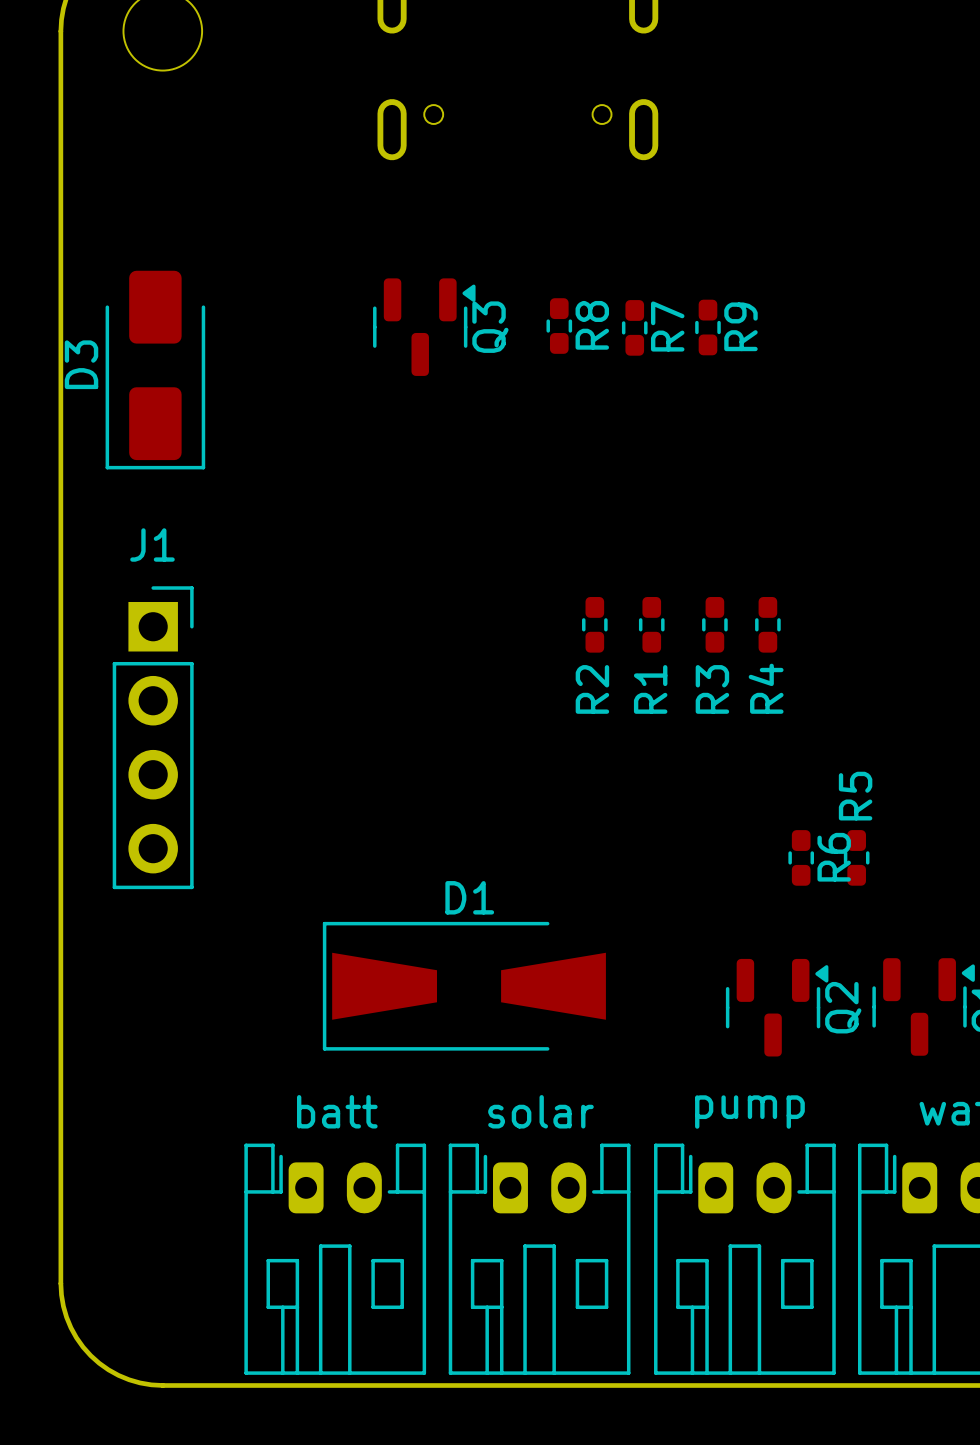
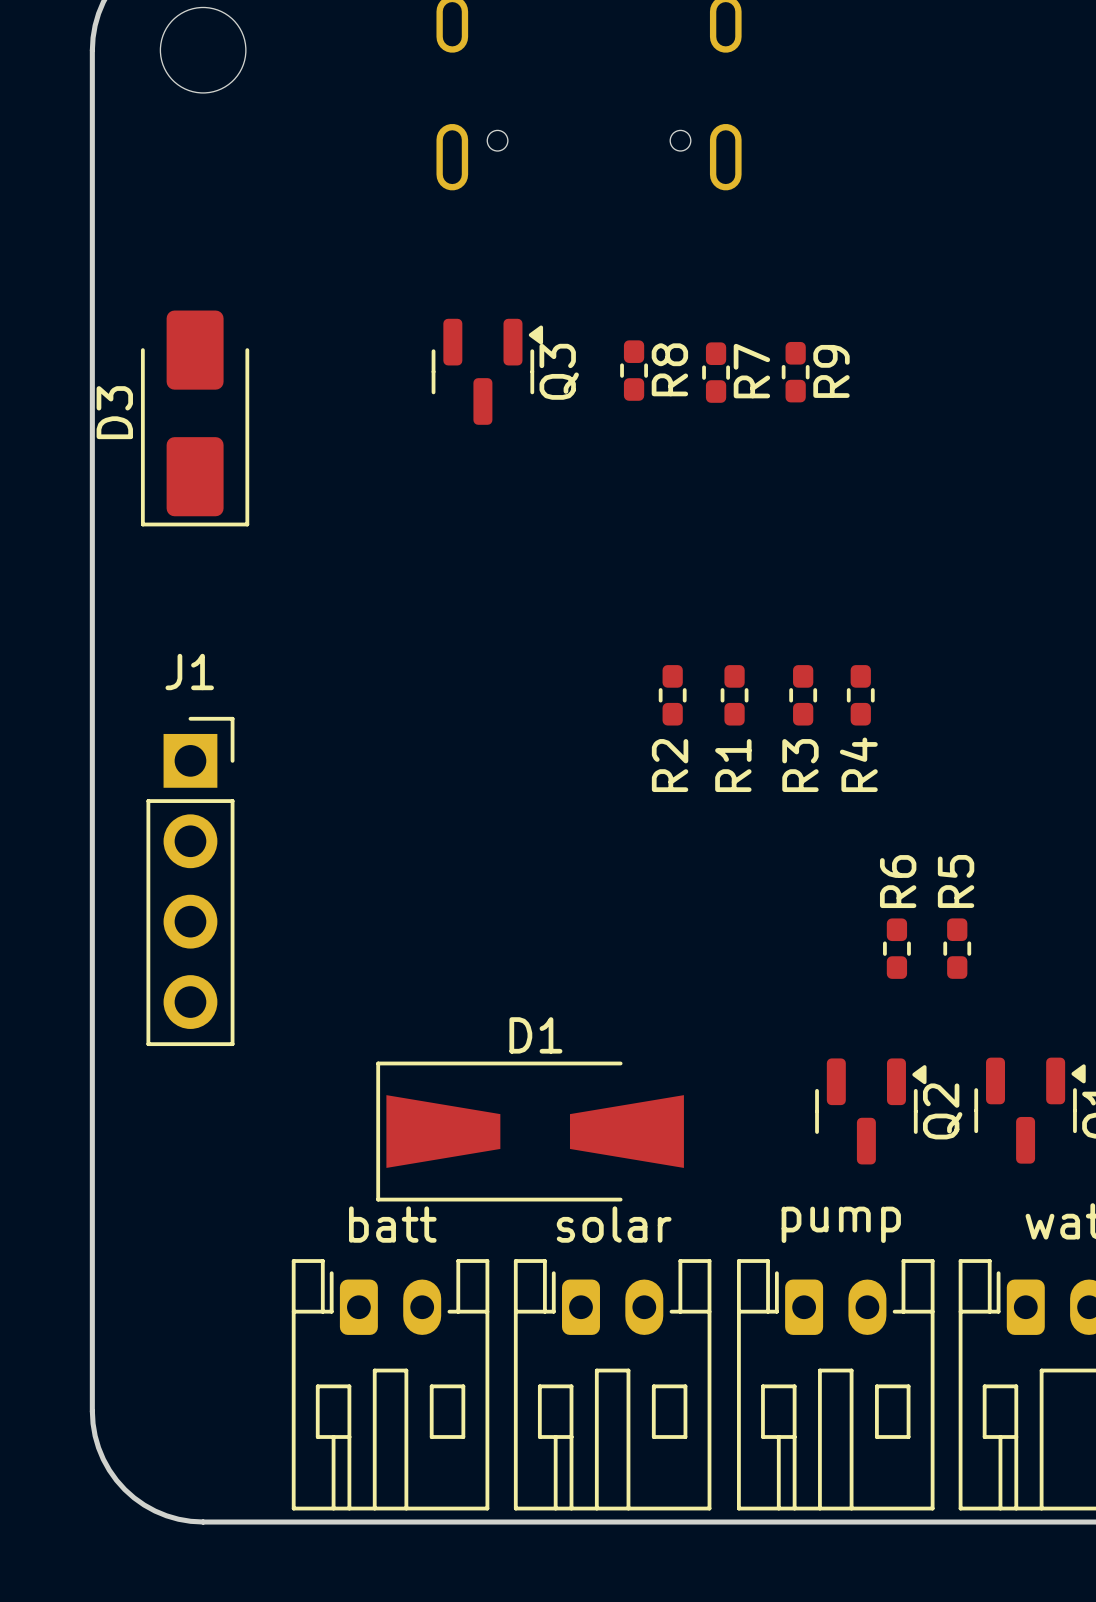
J1 position: (153, 737) -> (190, 881)
R6 name position: R6 (834, 857) -> R6 (898, 881)
D1 position: (464, 986) -> (530, 1131)

